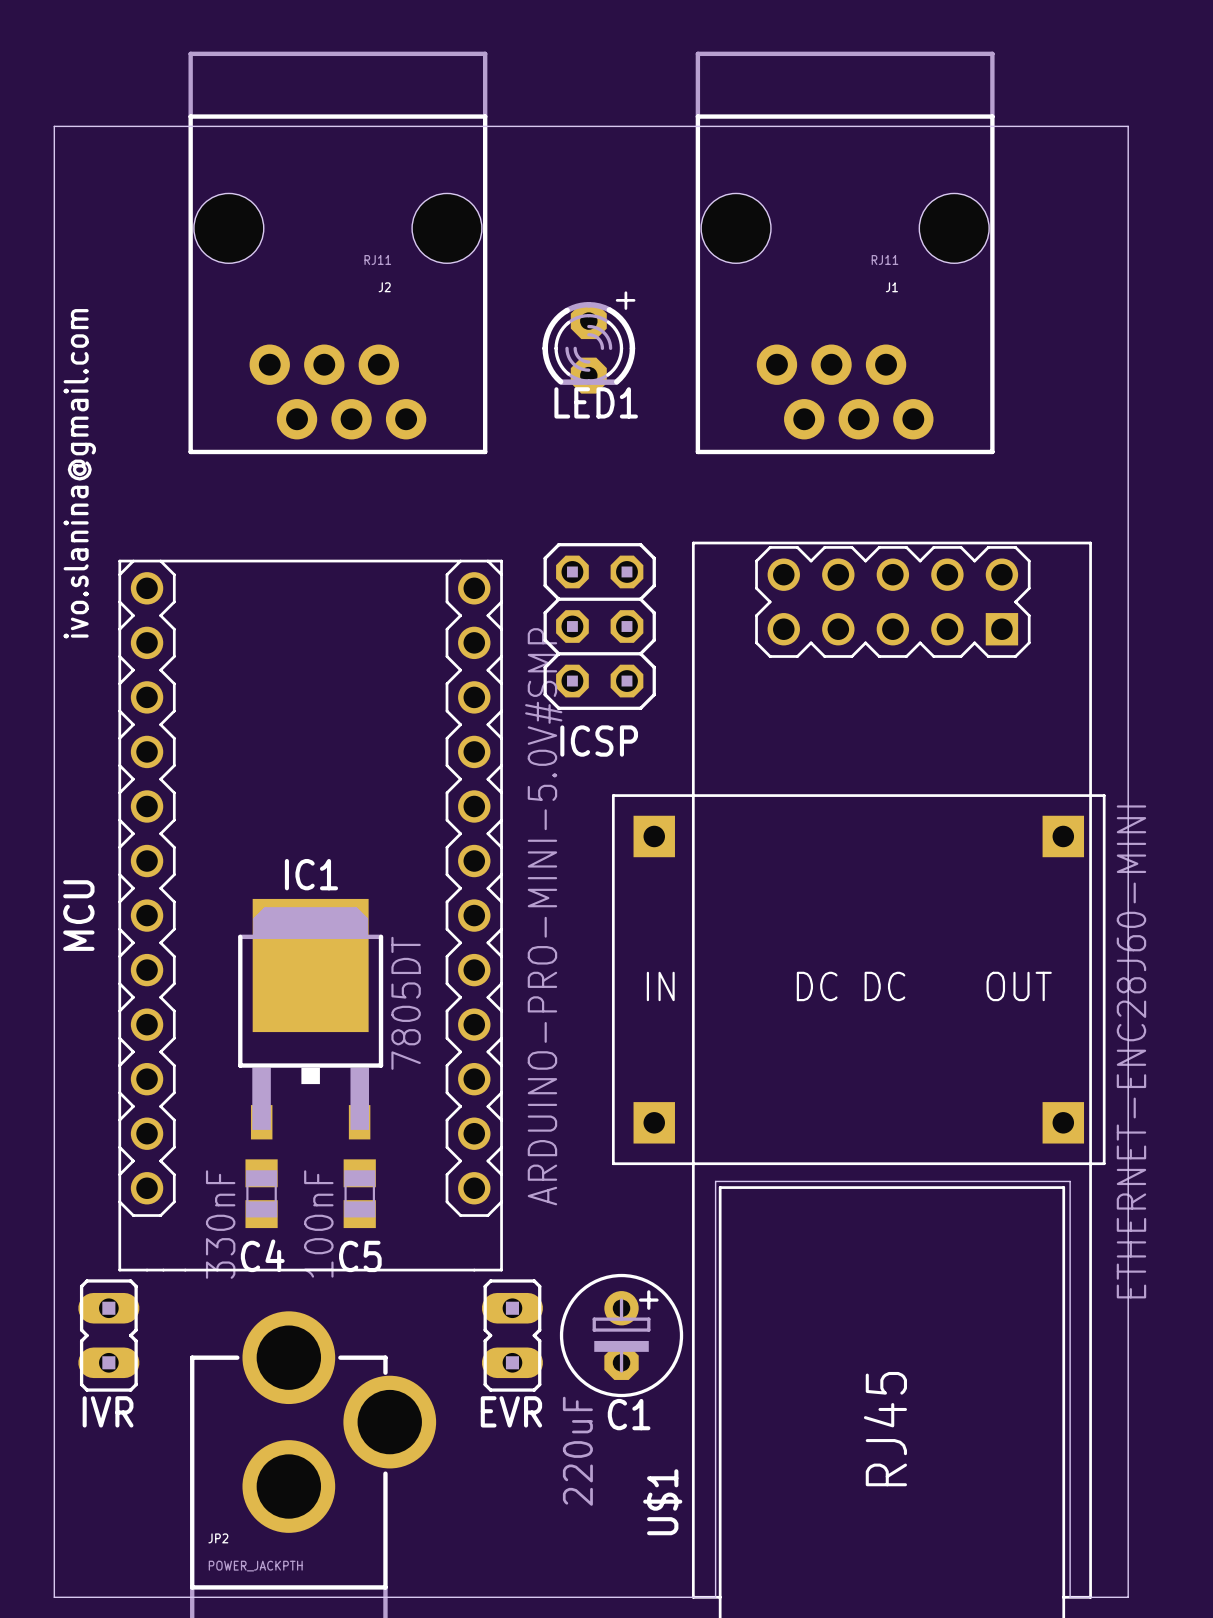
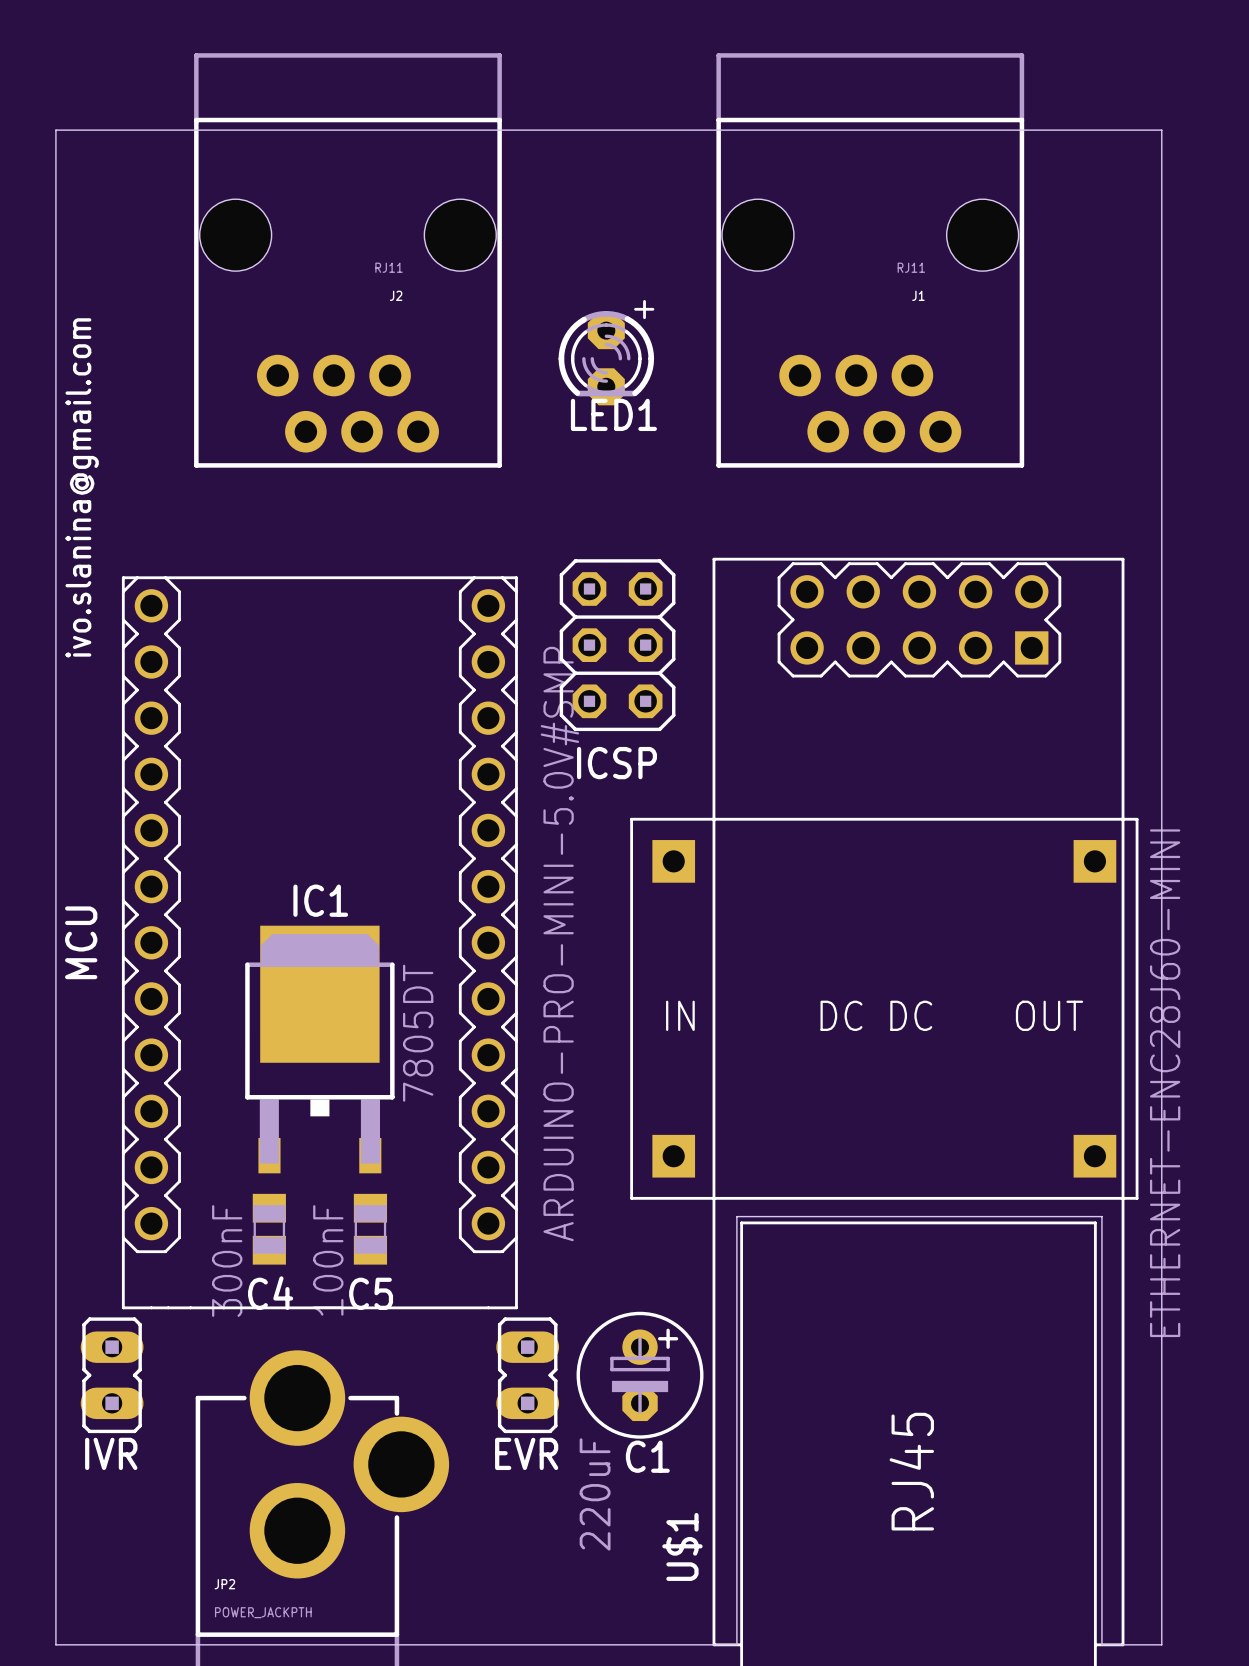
C4 value: 330nF (220, 1224) -> 300nF (227, 1261)

